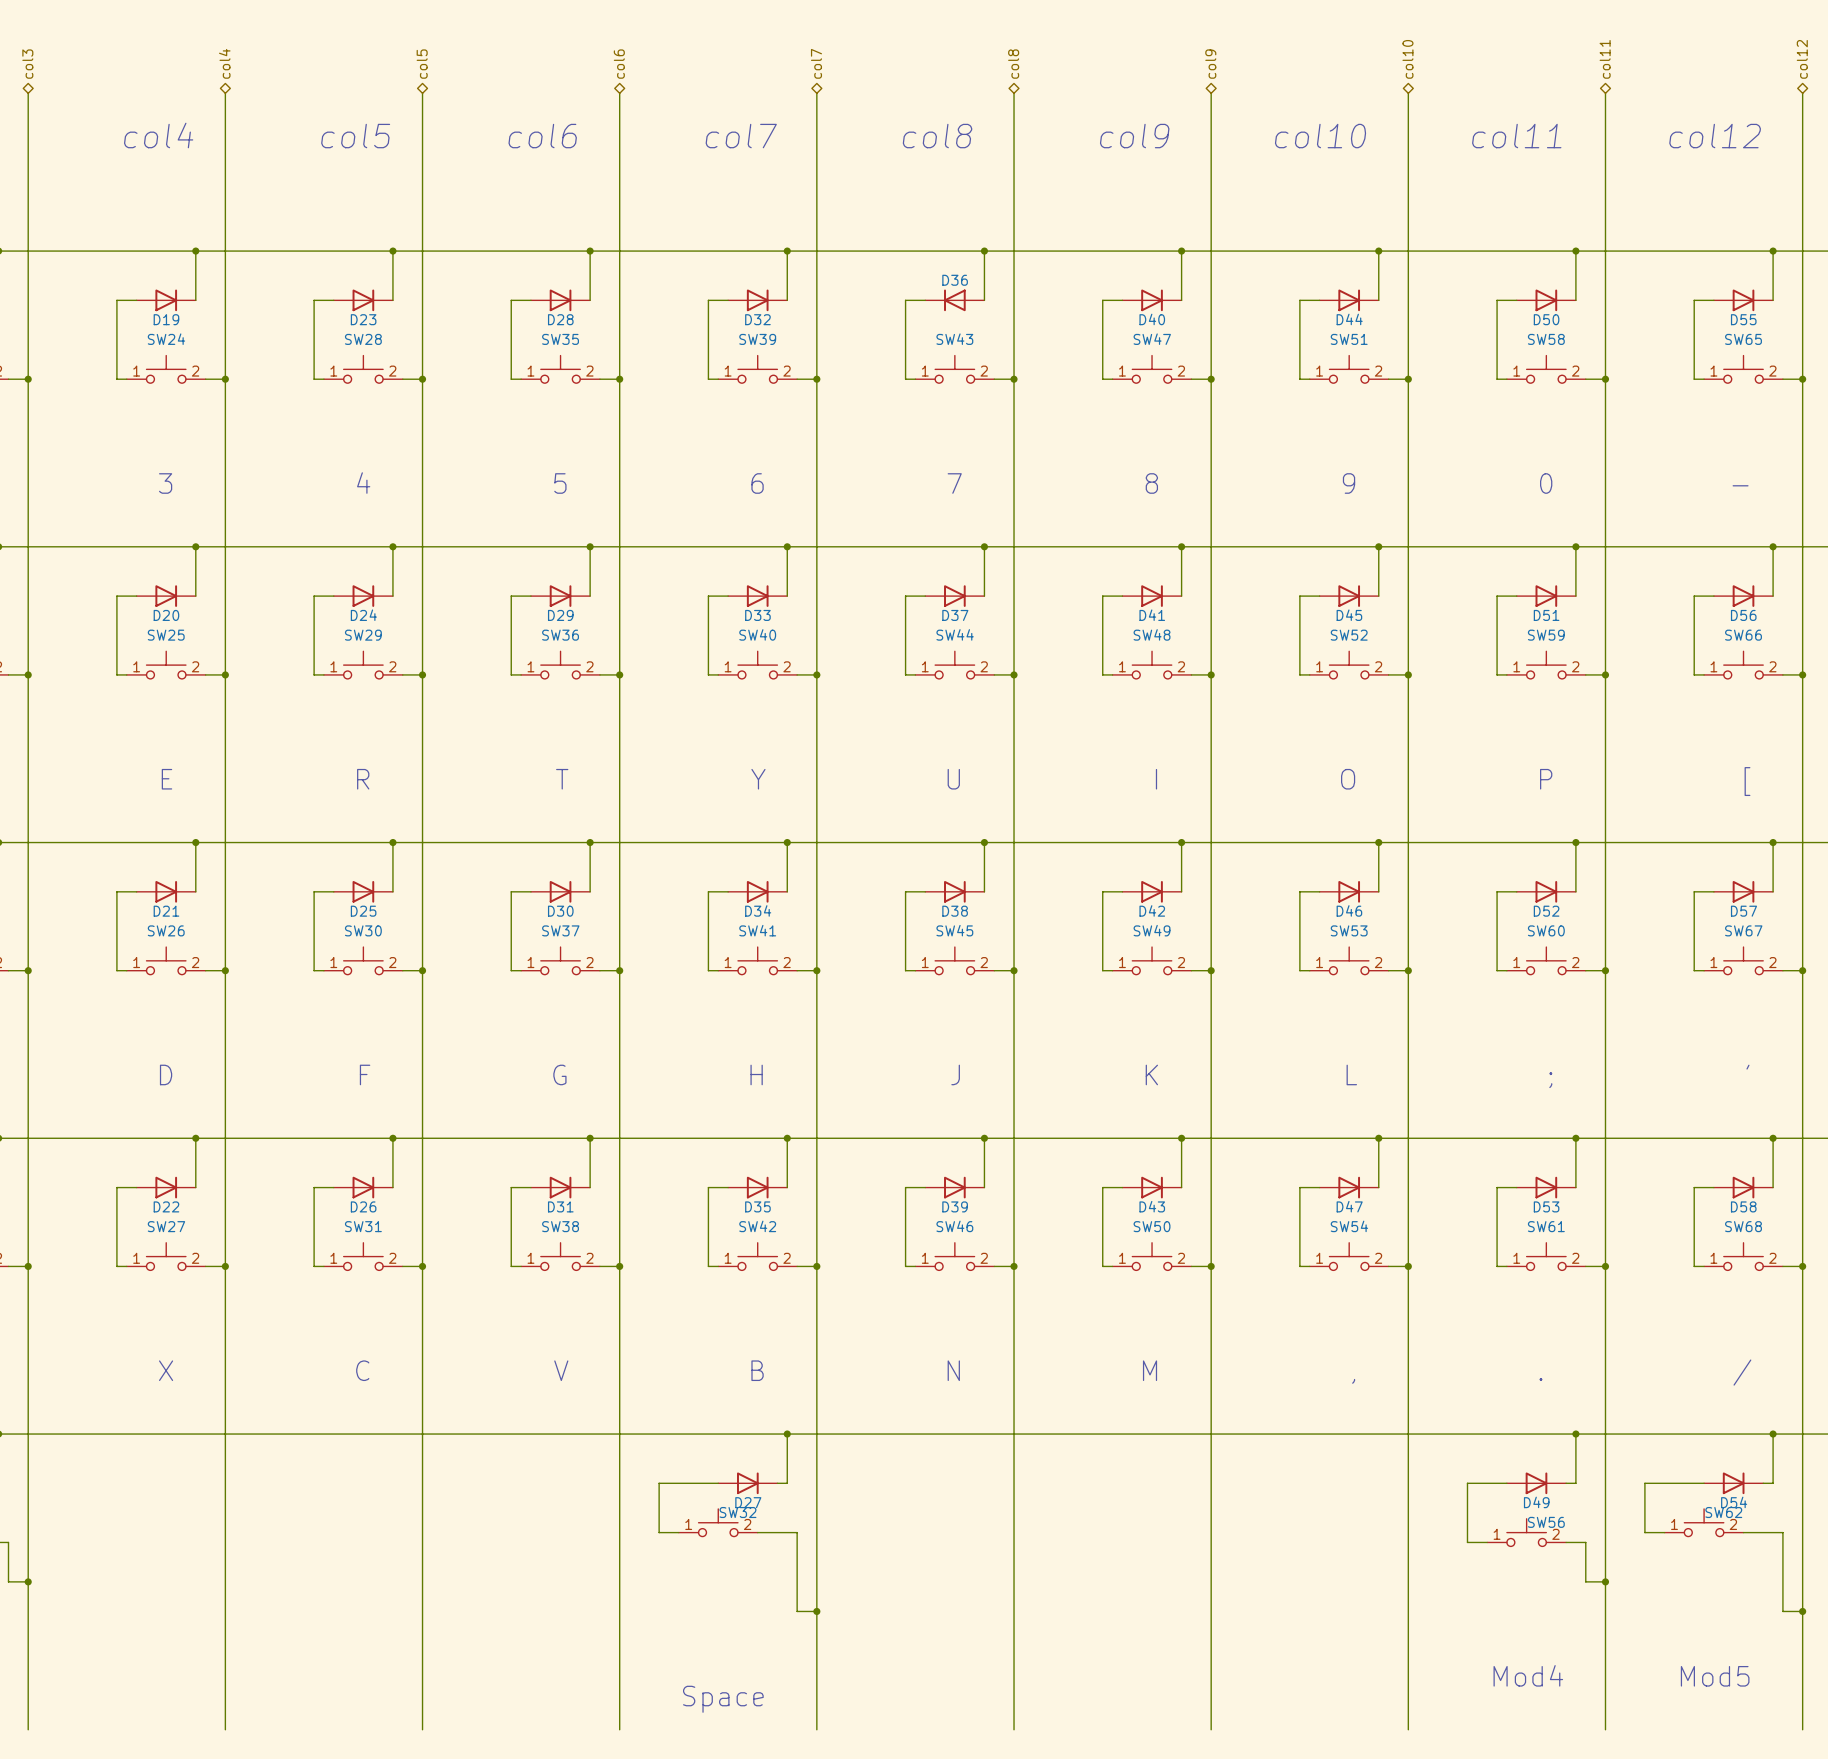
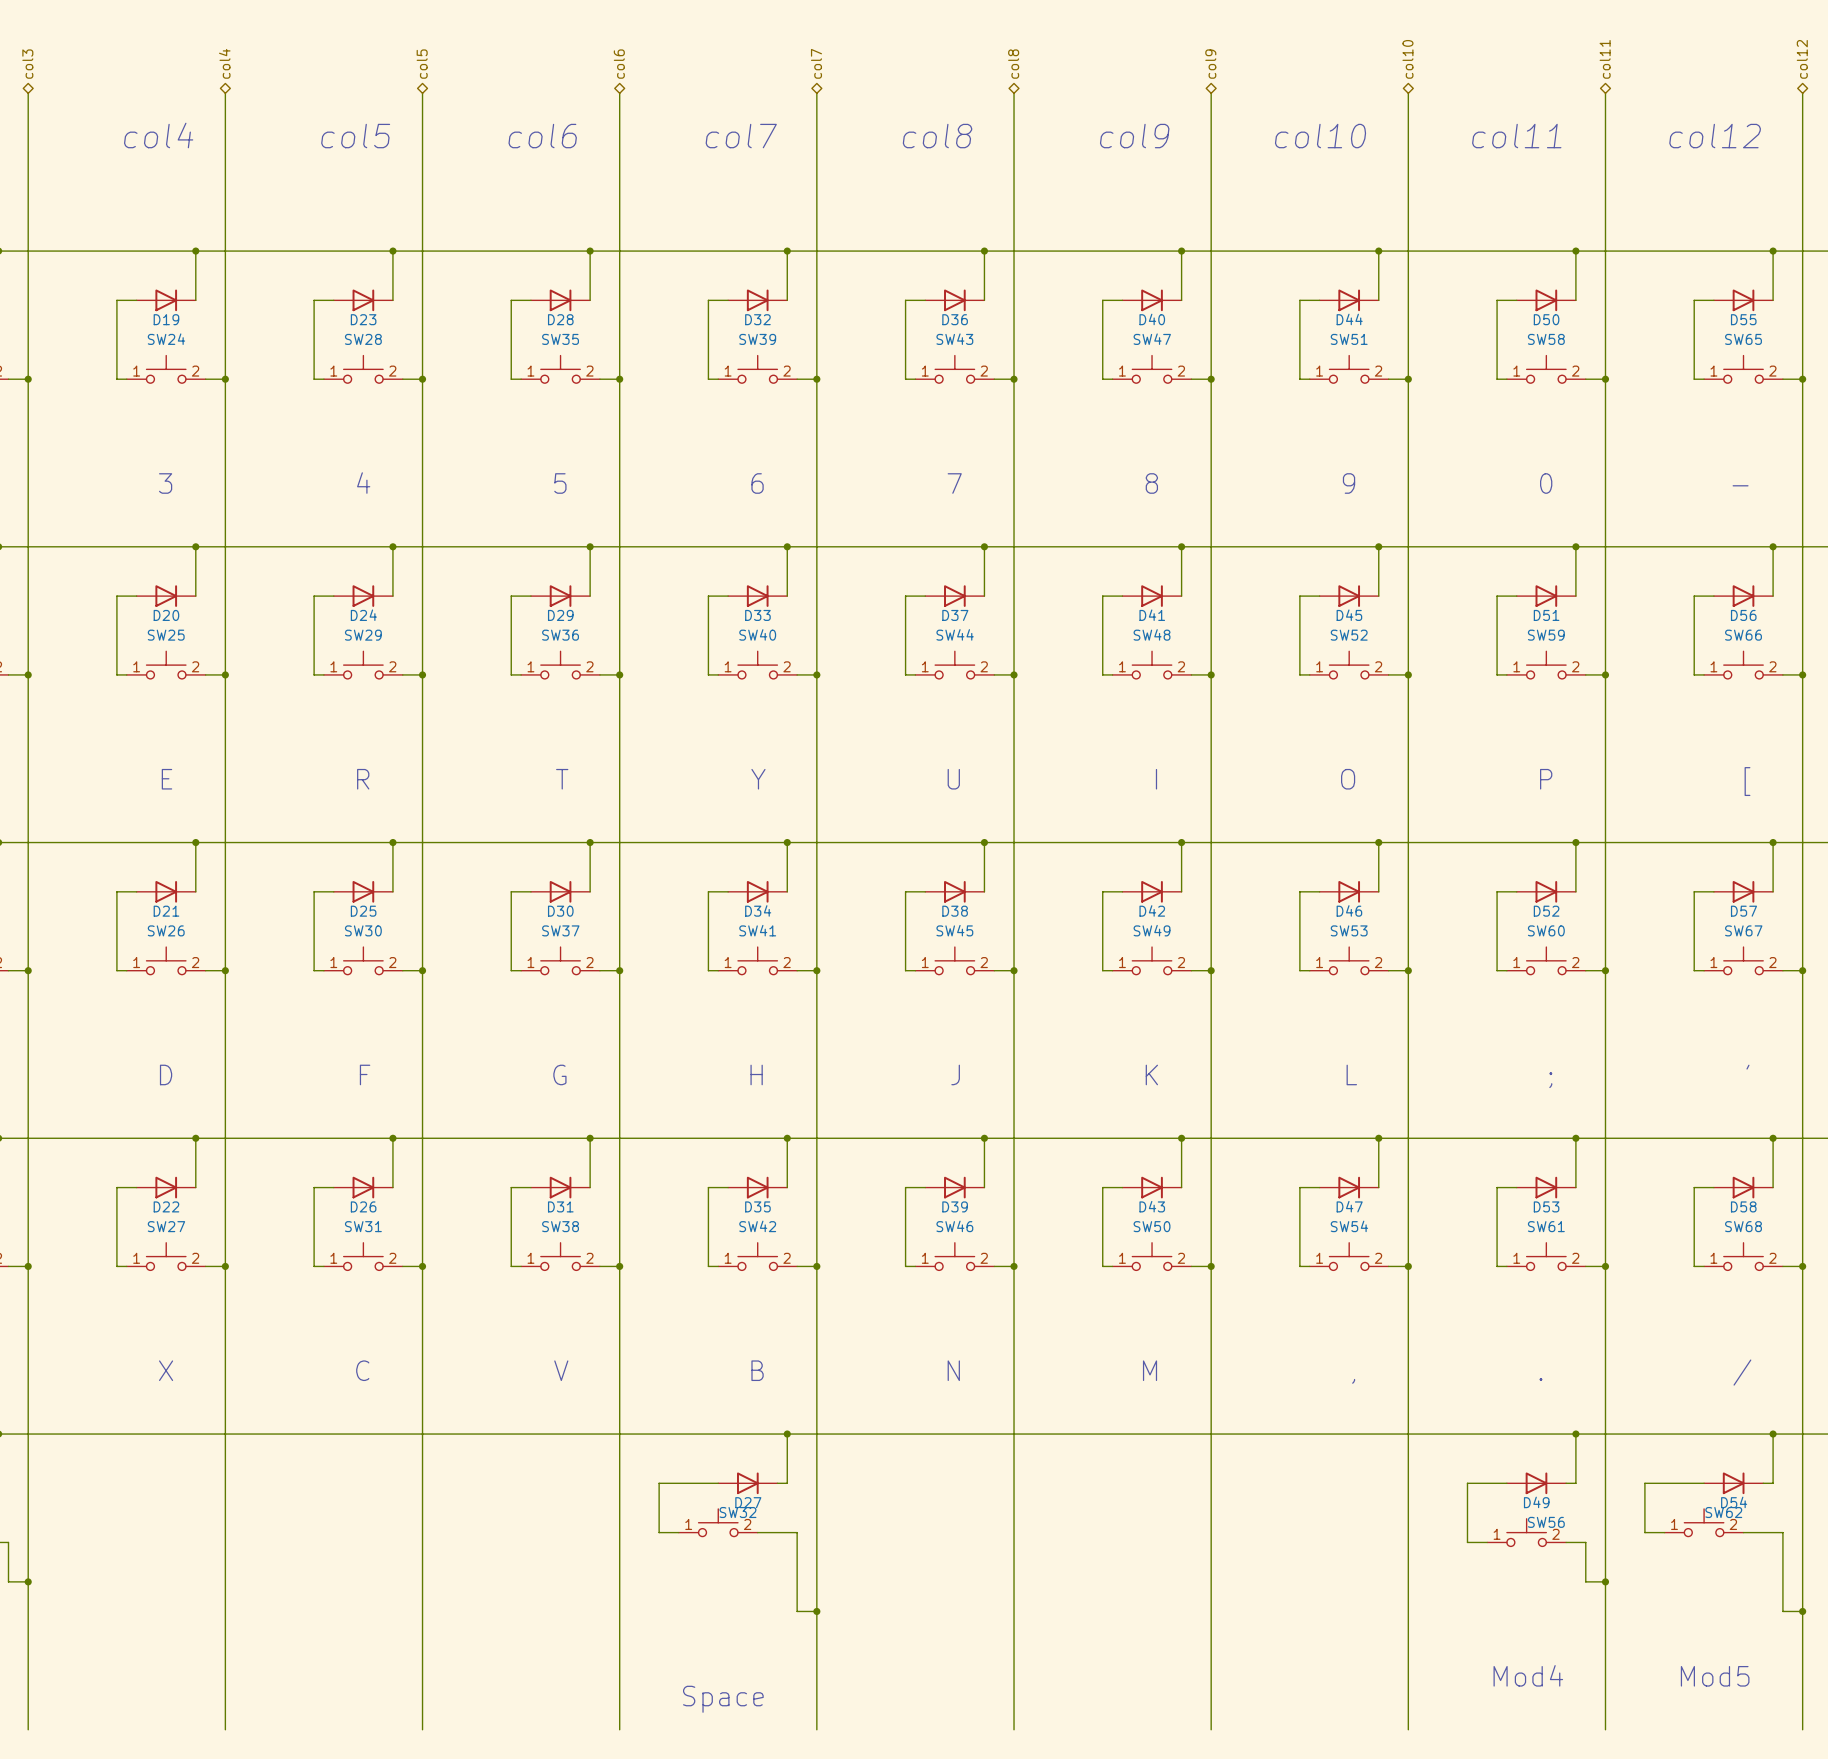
D36 rotation: 0° (954, 300) -> 180° (954, 300)

